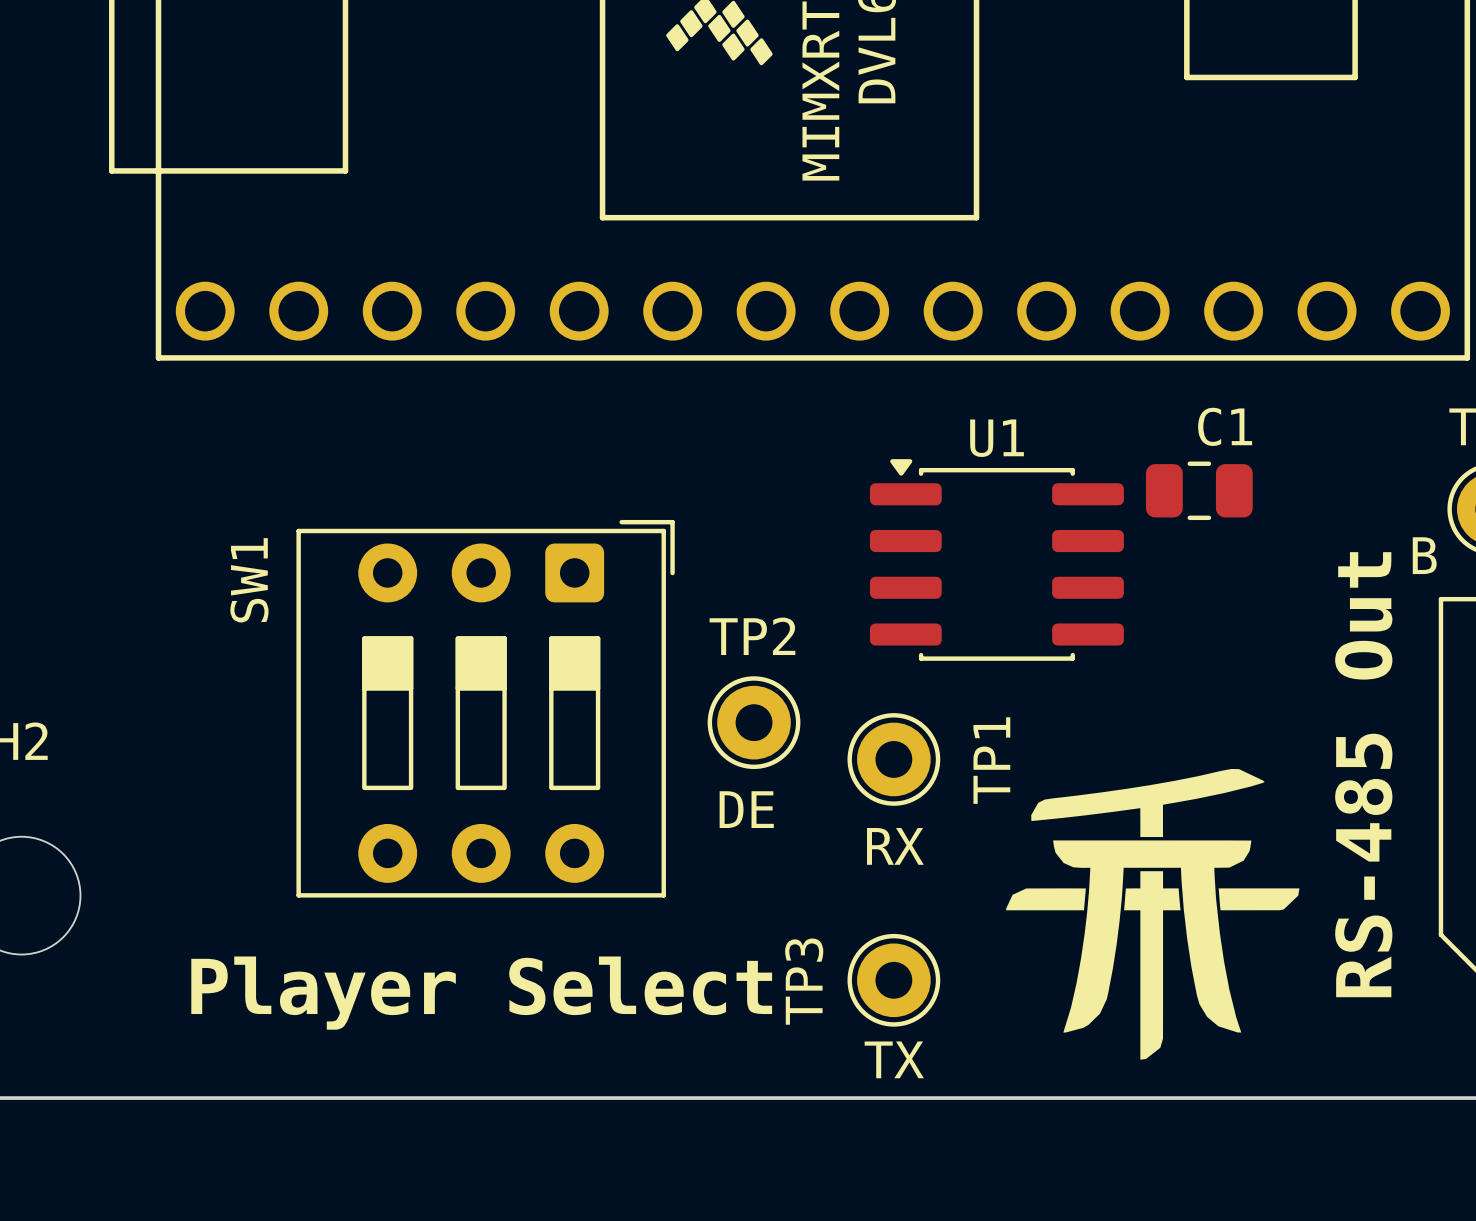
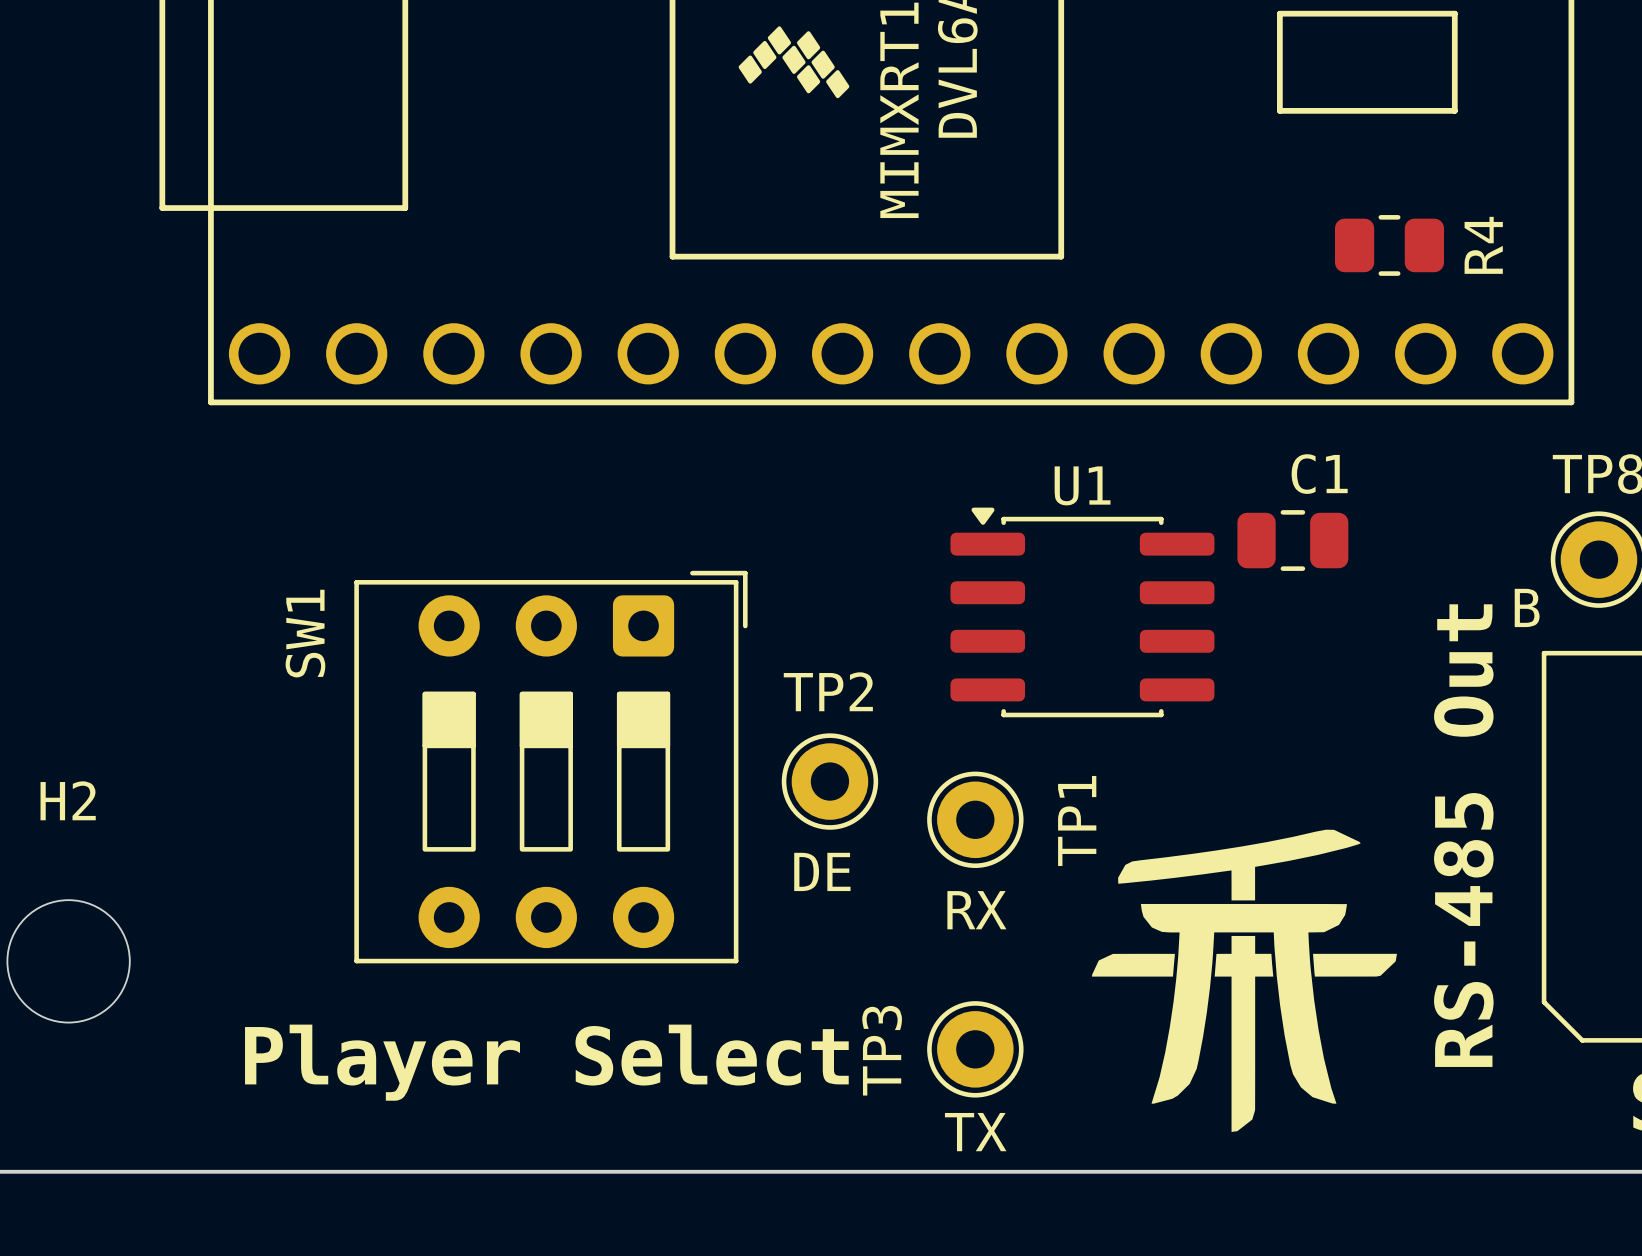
R4: none -> (1389, 245)

